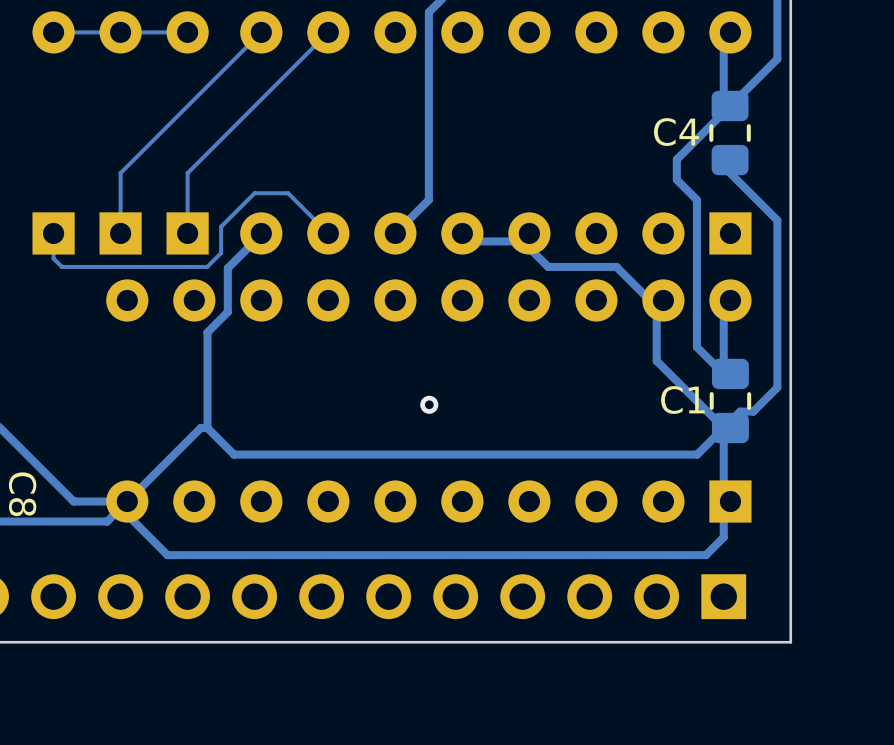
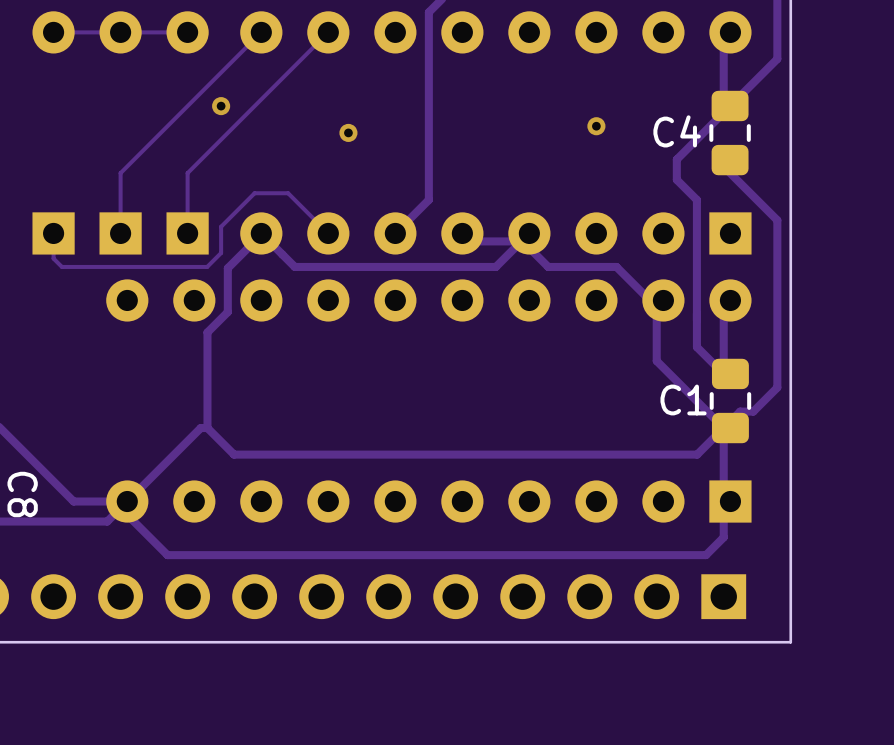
via: none -> (221, 106)
via: none -> (596, 126)
via: none -> (348, 132)
track: none -> (529, 233) (495, 266) (294, 266) (261, 233)
via: (429, 404) -> none

